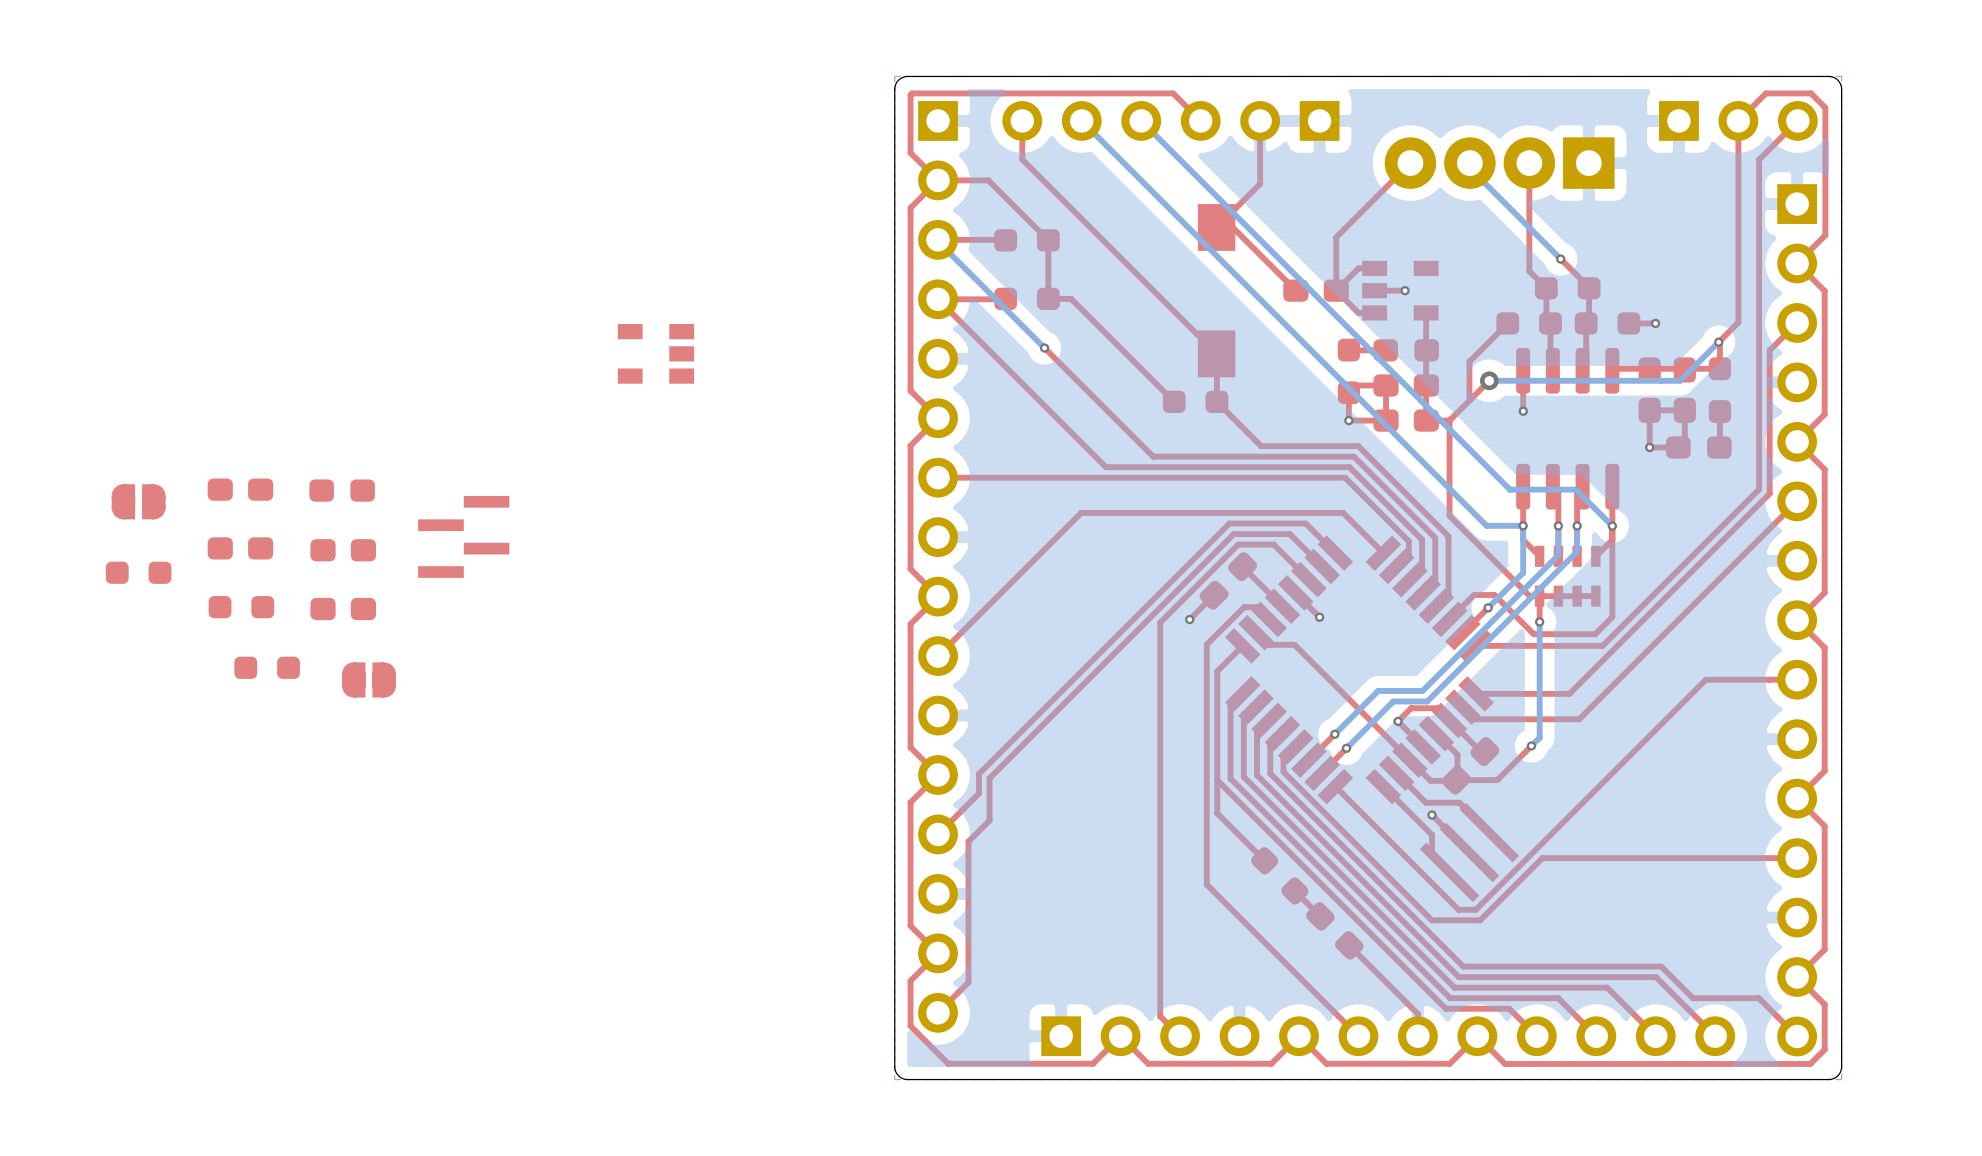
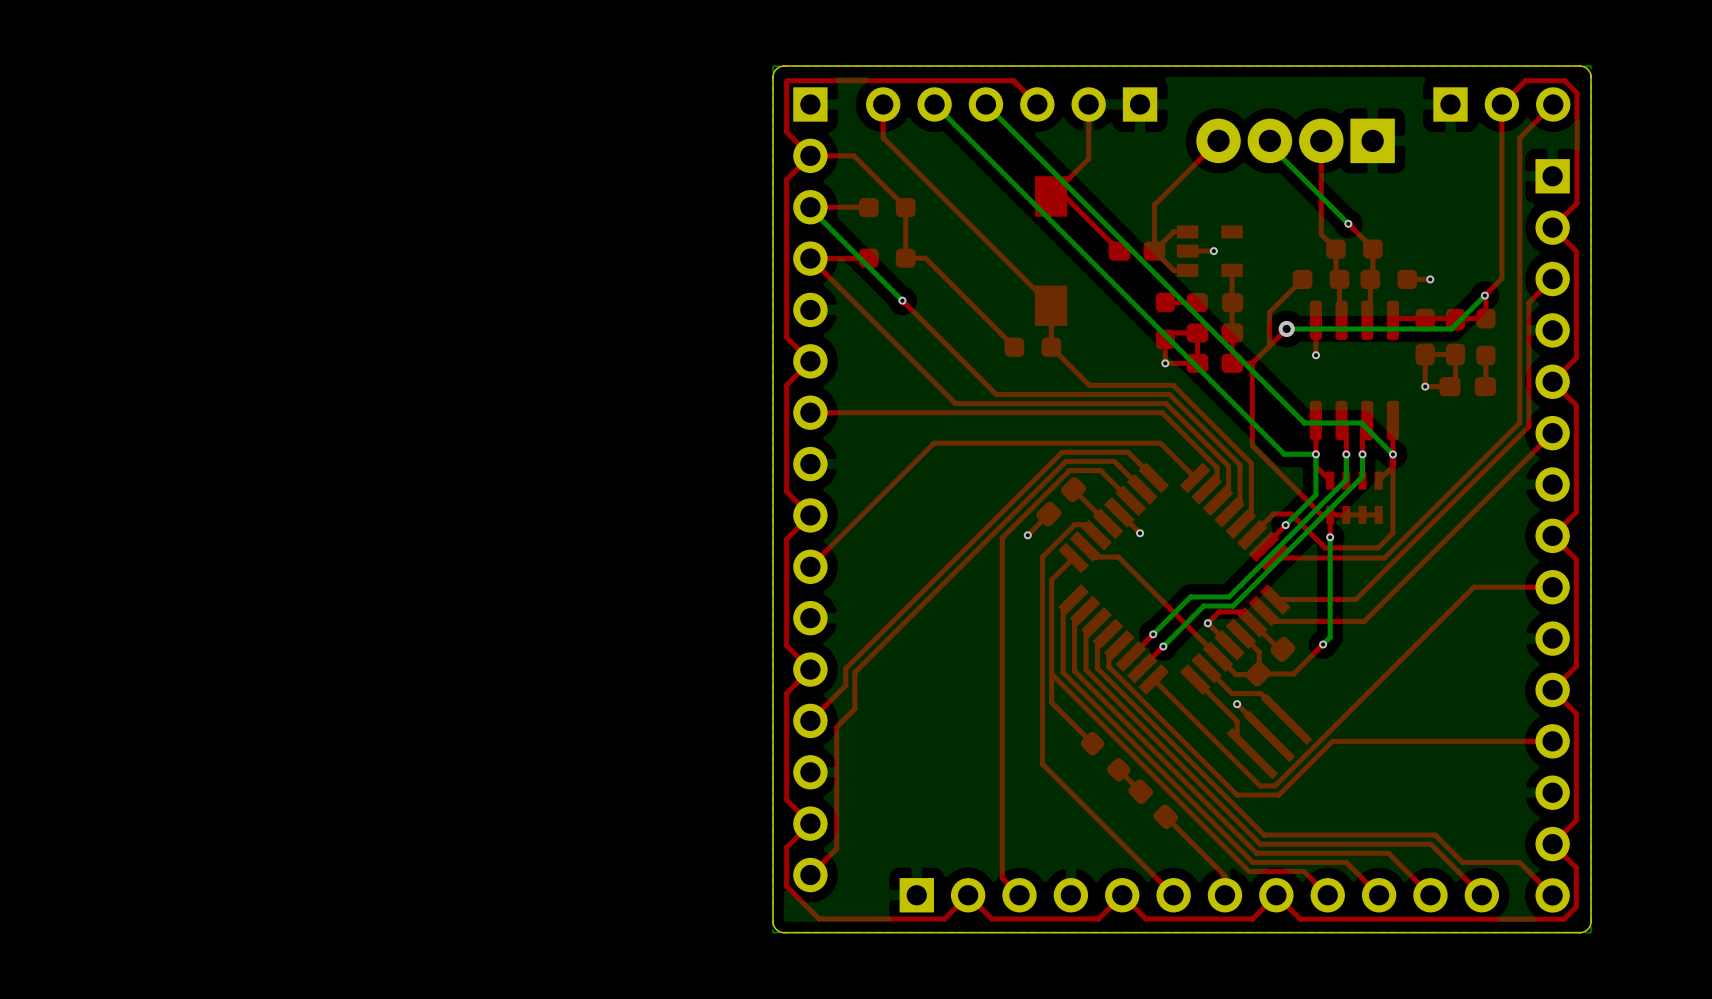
part: (655, 353) -> none
part: (240, 489) -> none
part: (342, 490) -> none
part: (138, 501) -> none
part: (463, 536) -> none
part: (240, 548) -> none
part: (343, 550) -> none
part: (138, 572) -> none
part: (241, 607) -> none
part: (343, 609) -> none
part: (267, 667) -> none
part: (368, 679) -> none

